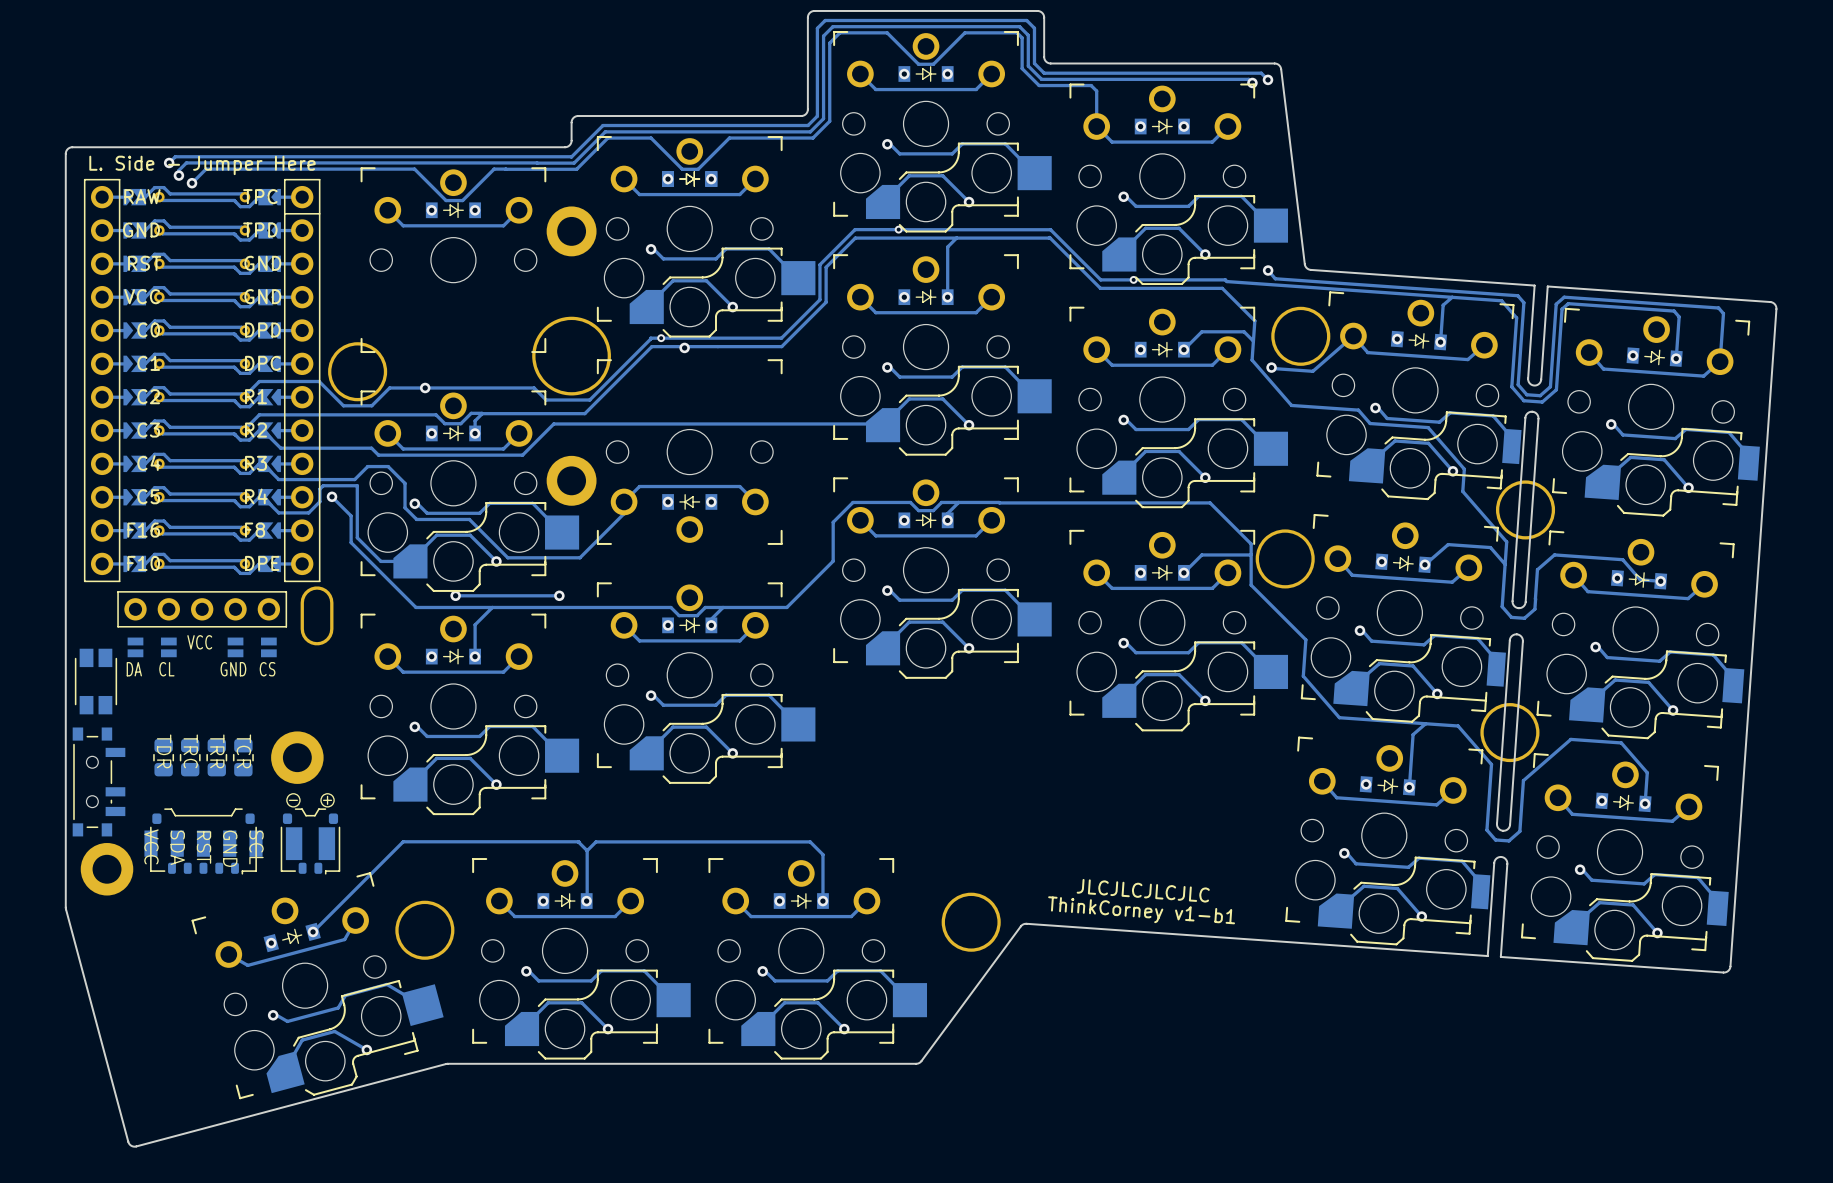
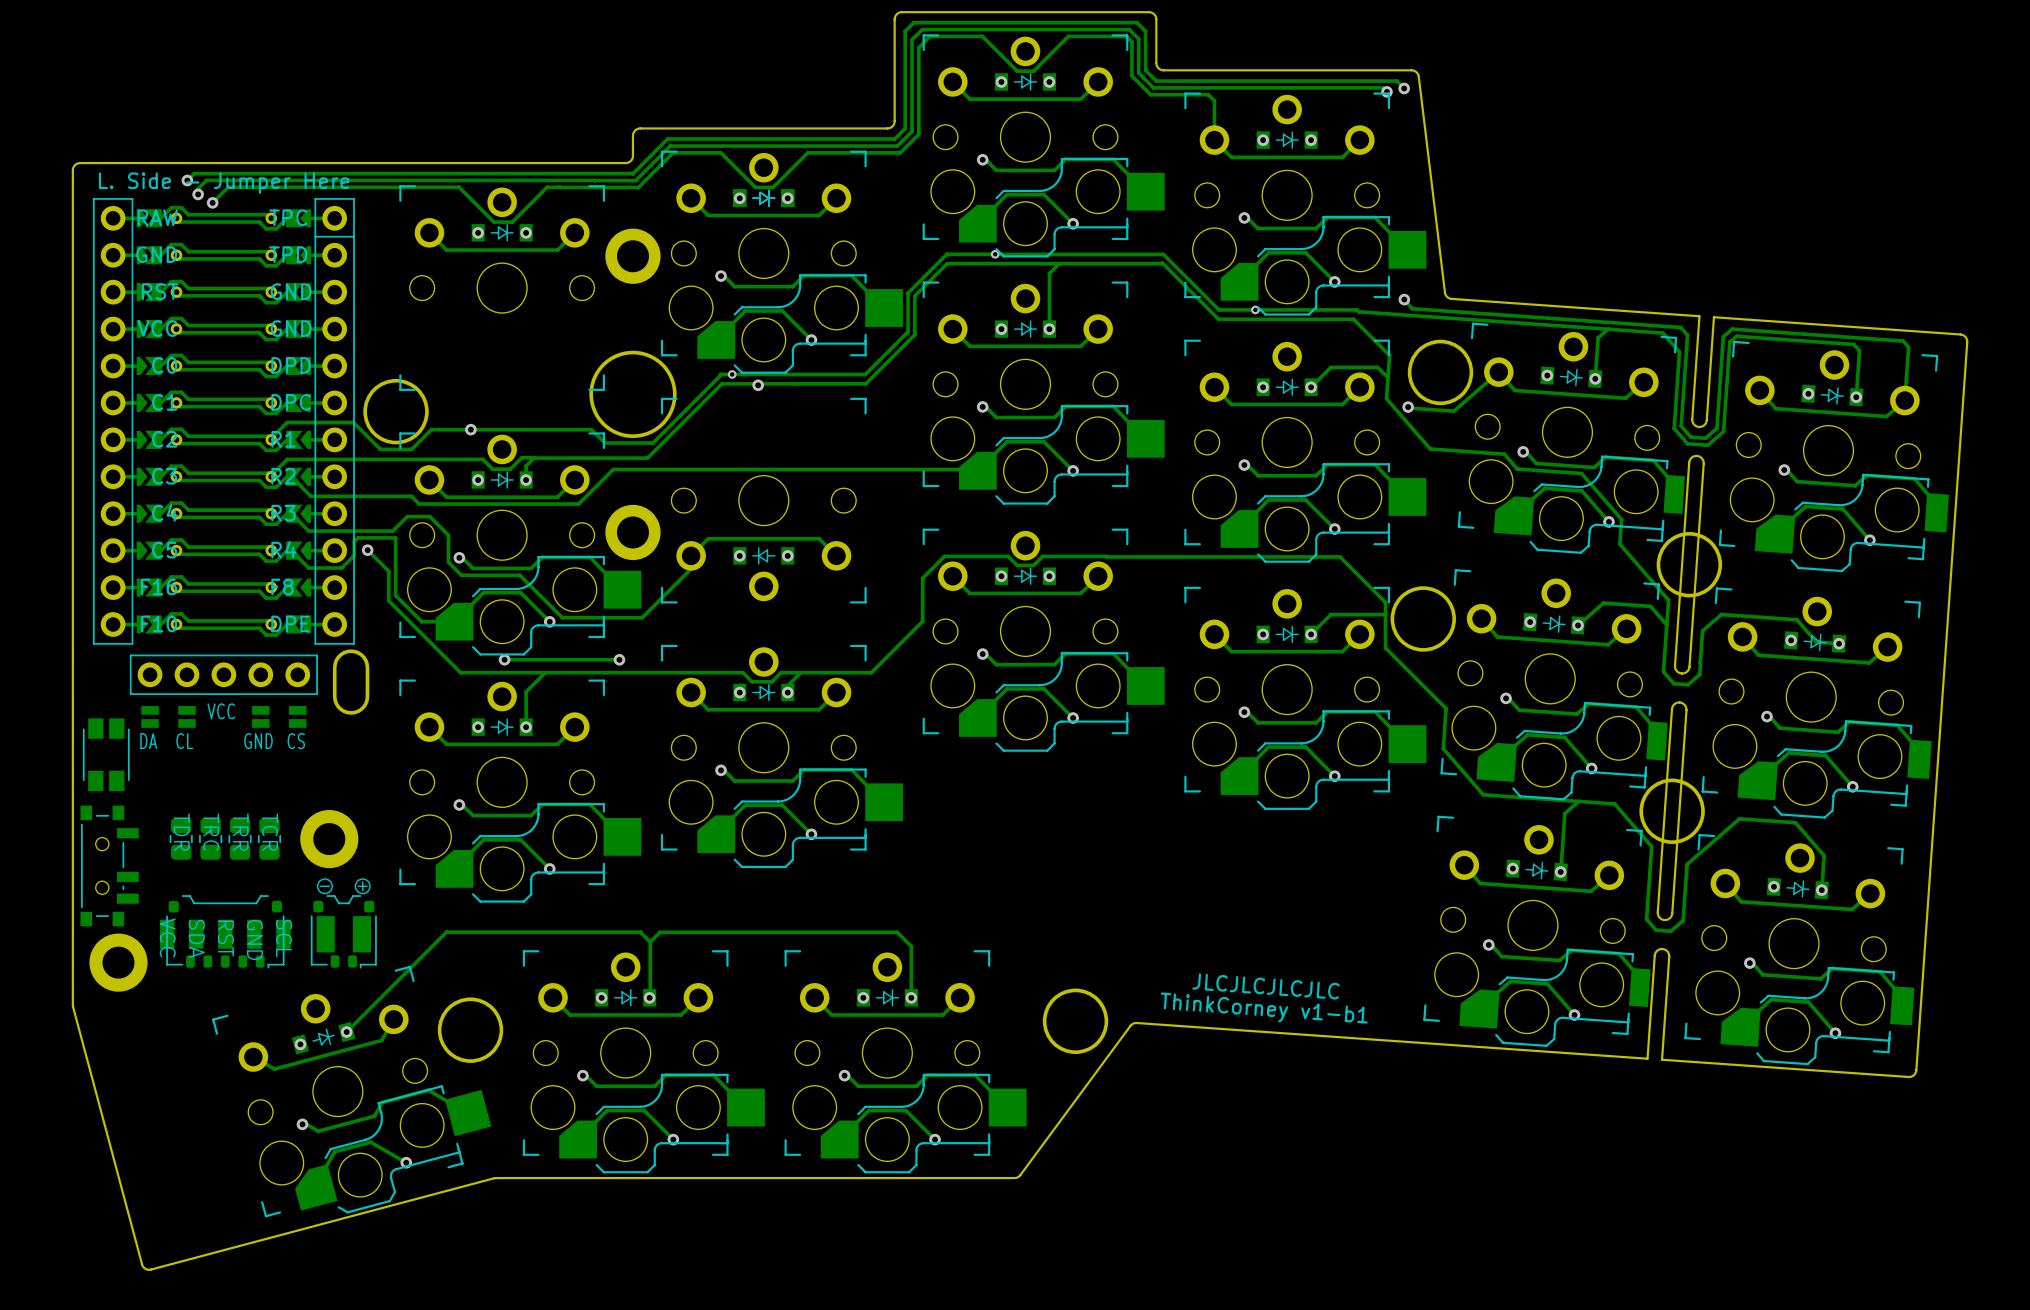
track: (958, 502) (947, 513) (947, 520) -> none

